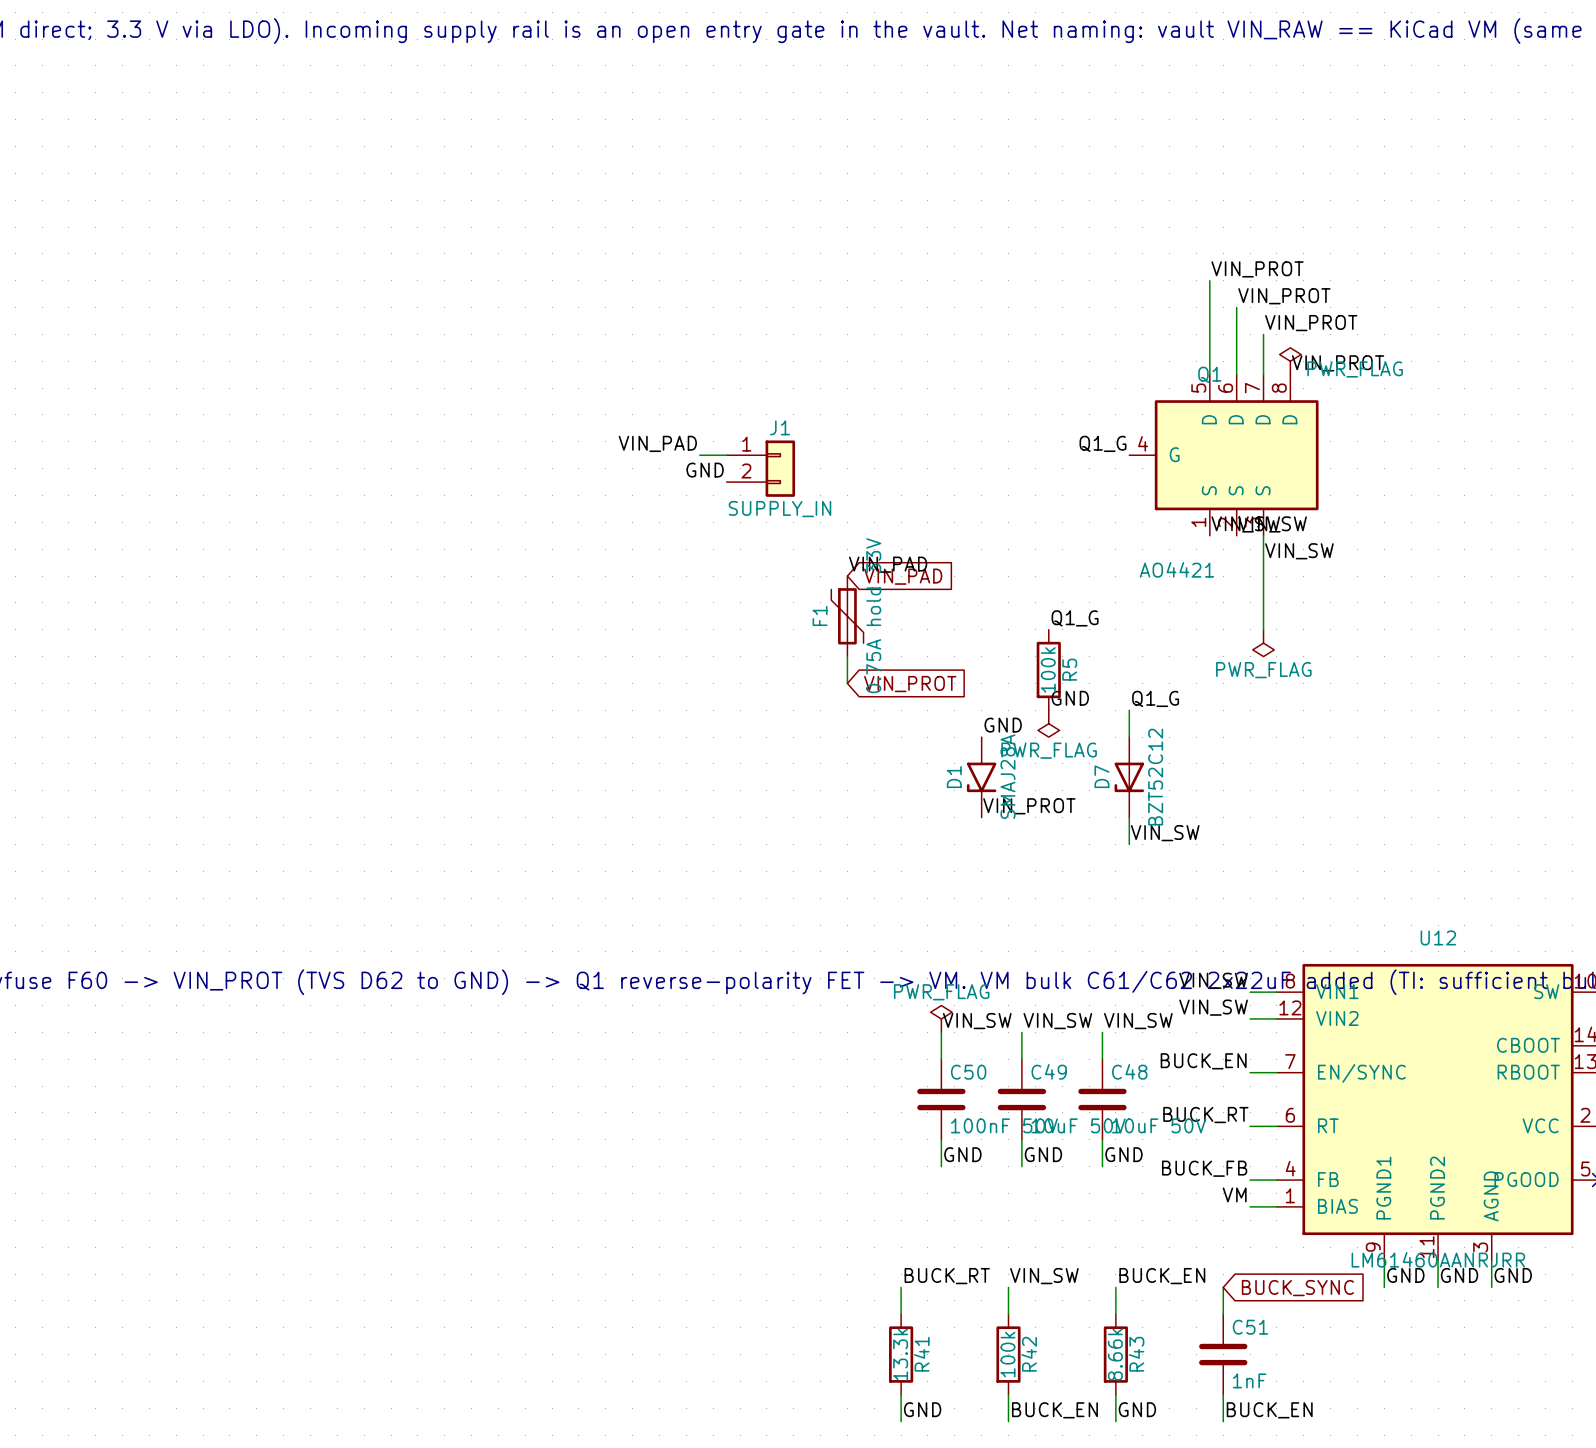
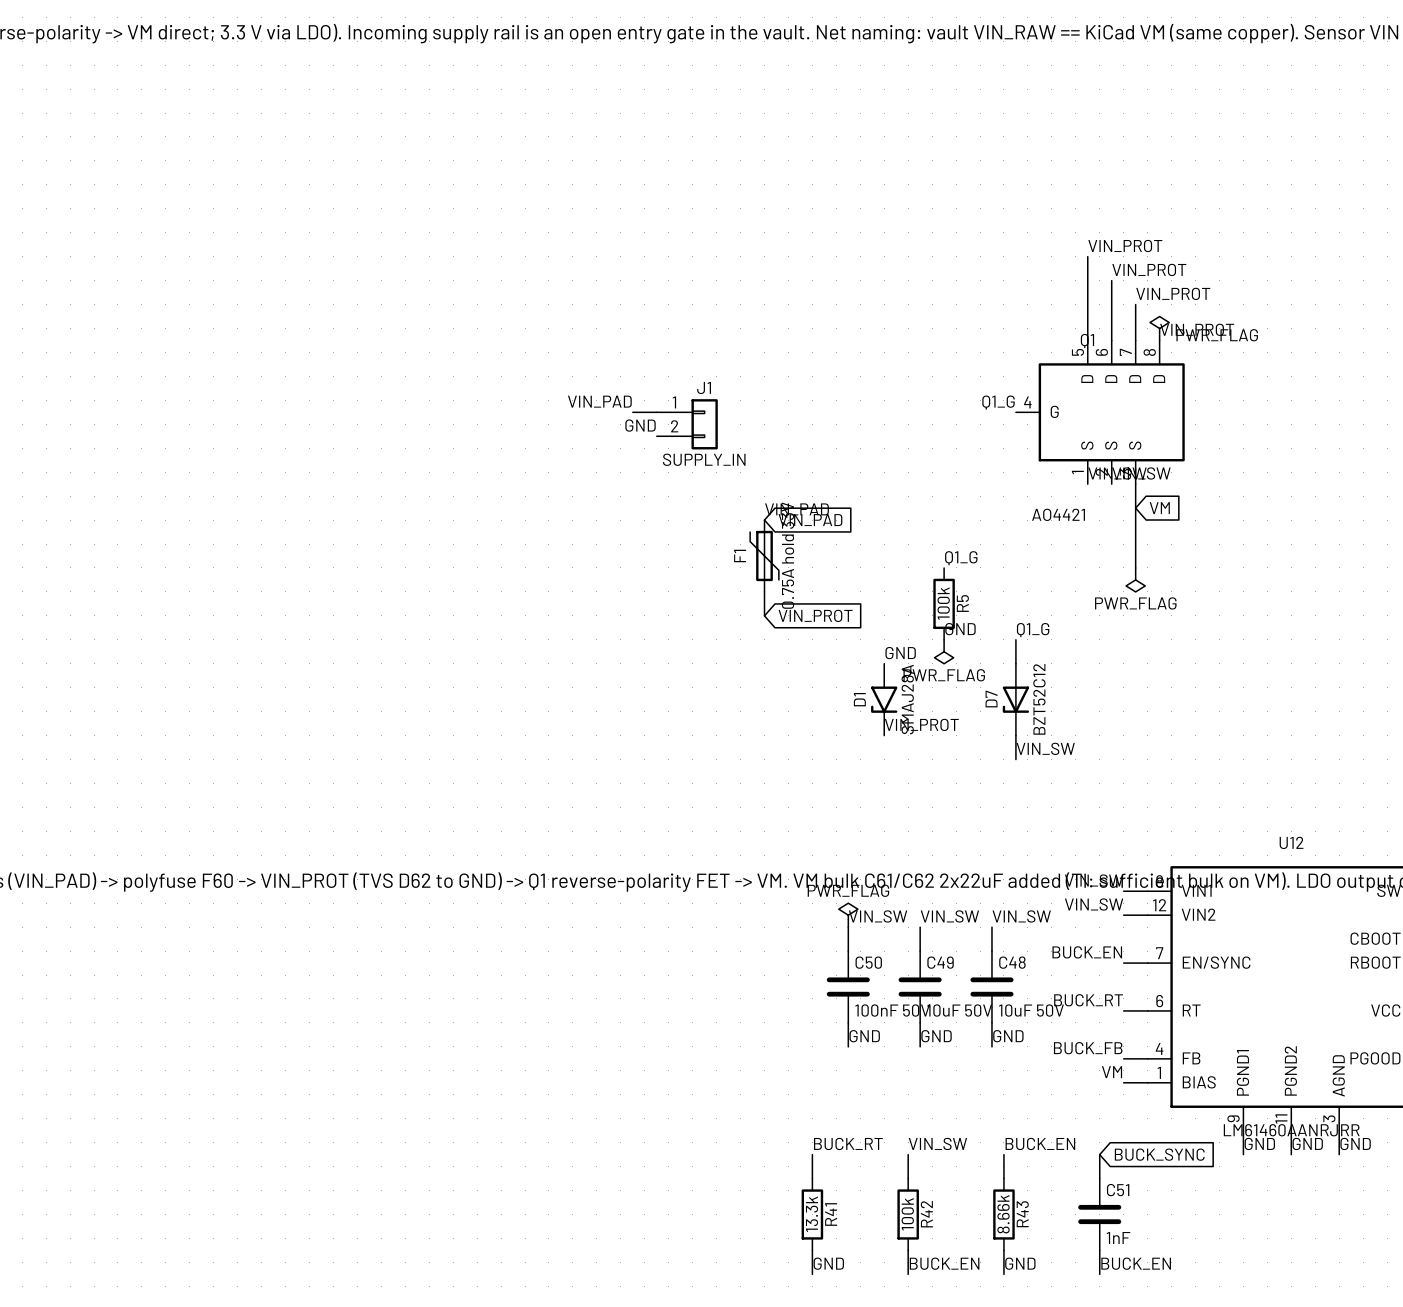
label: VIN_SW (1299, 551) -> none
global label: none -> VM (1159, 508)

